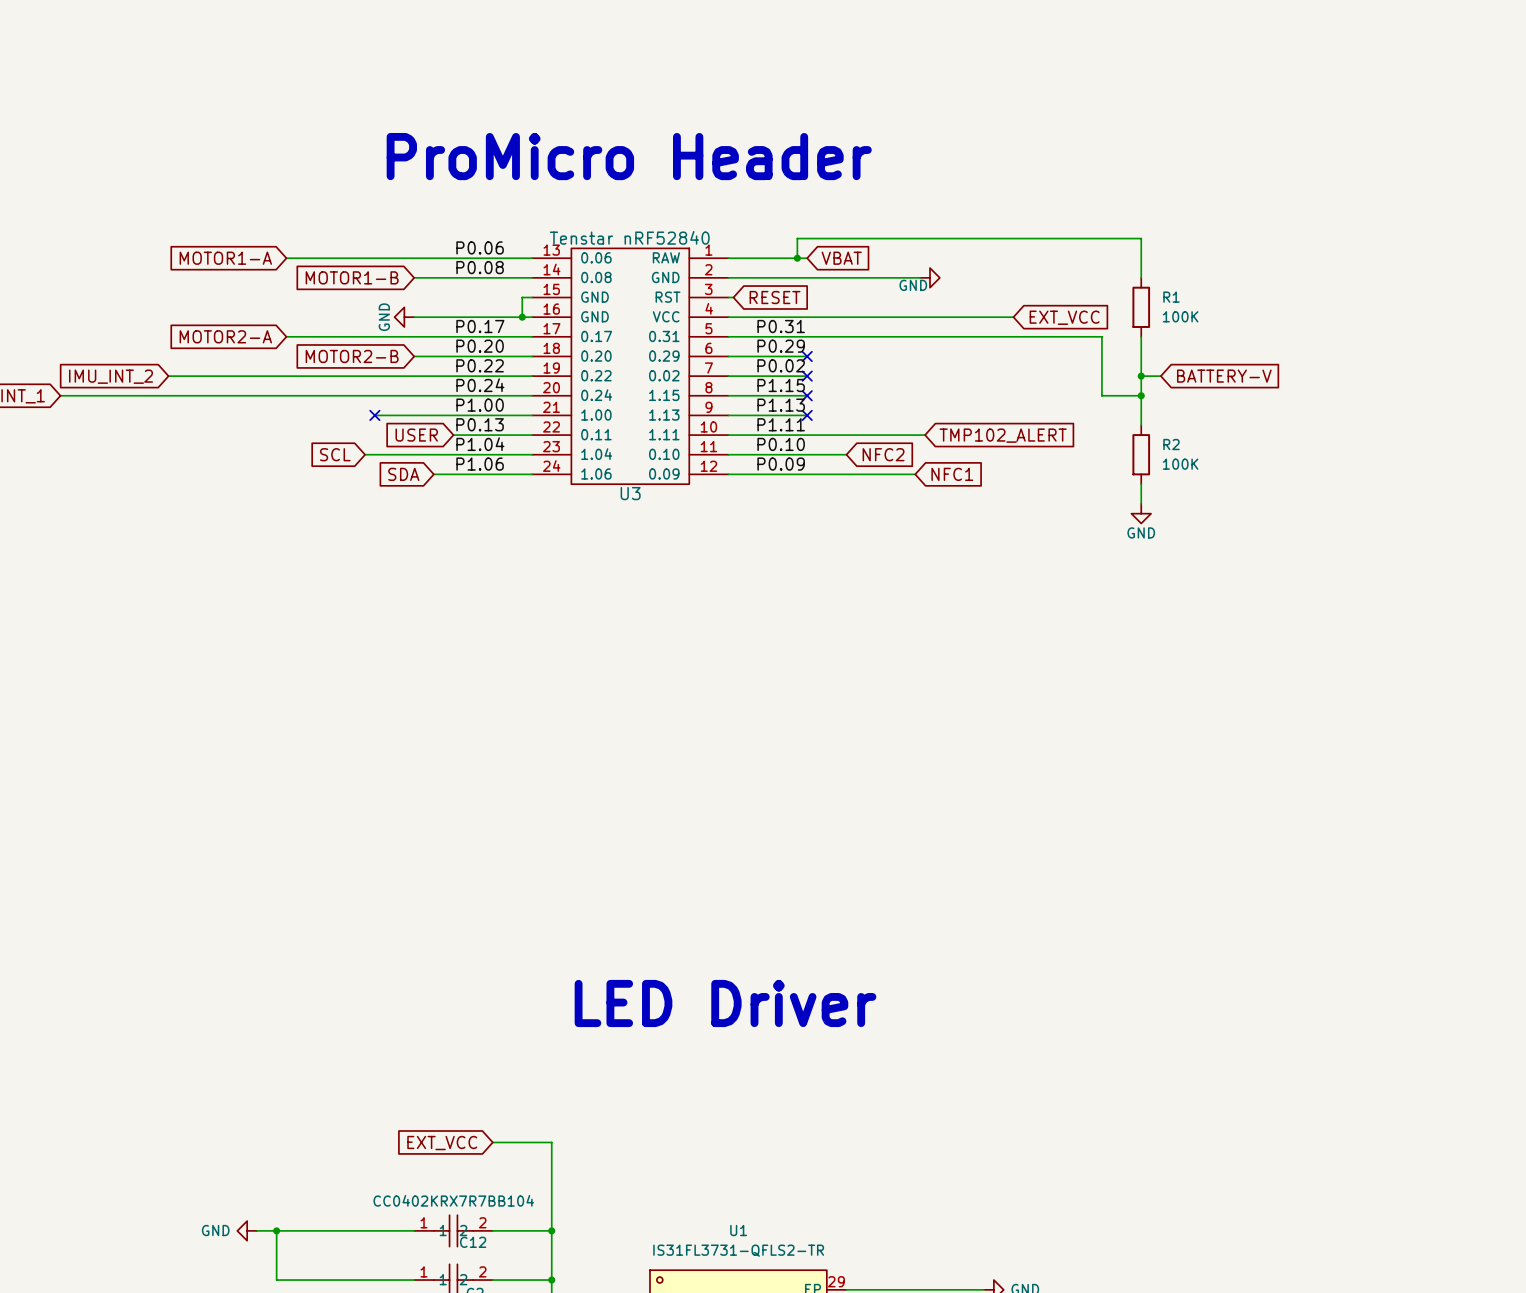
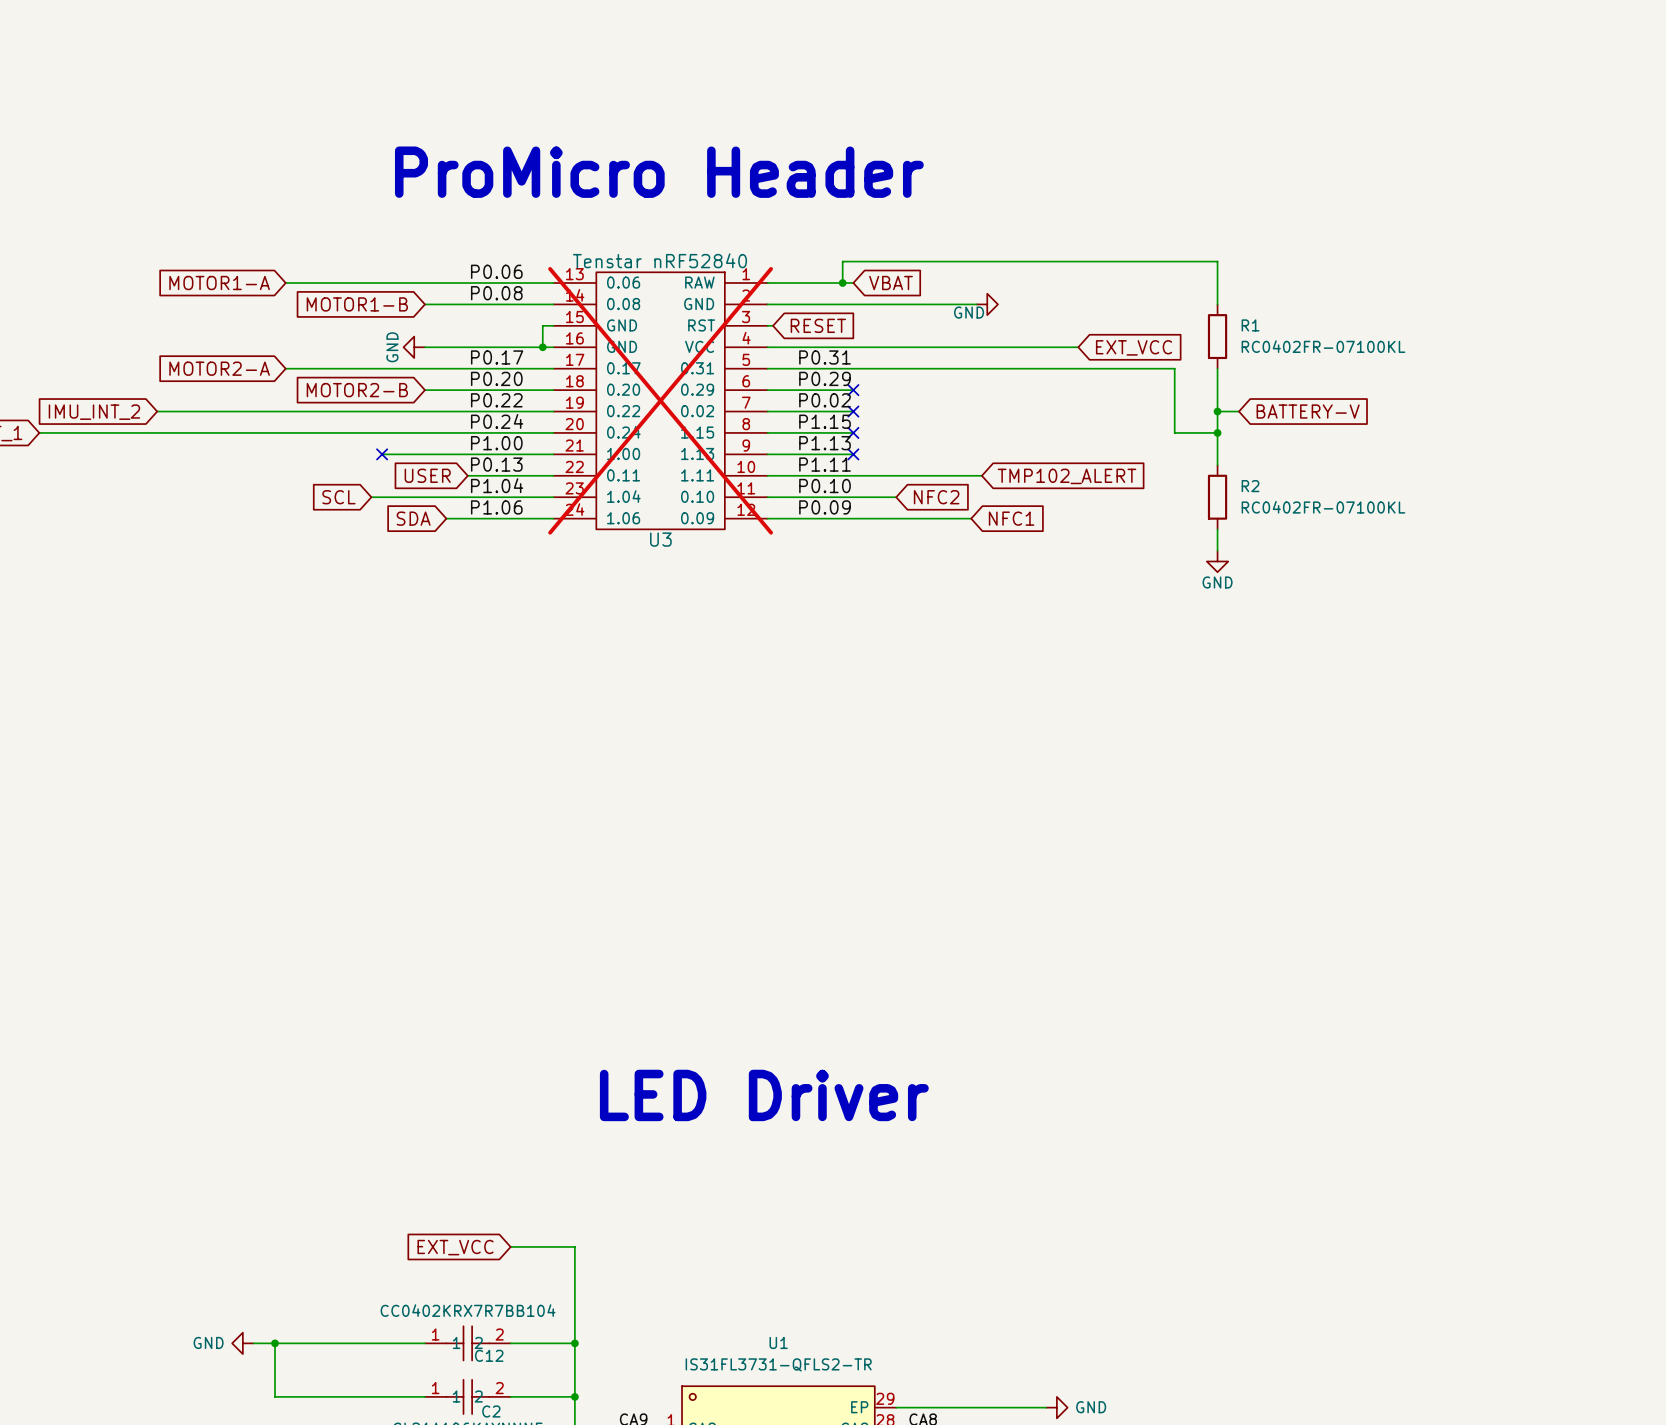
R1 value: 100K (1180, 316) -> RC0402FR-07100KL (1323, 346)
U3 do-not-place cross: none -> (660, 400)
R2 value: 100K (1180, 464) -> RC0402FR-07100KL (1323, 507)

